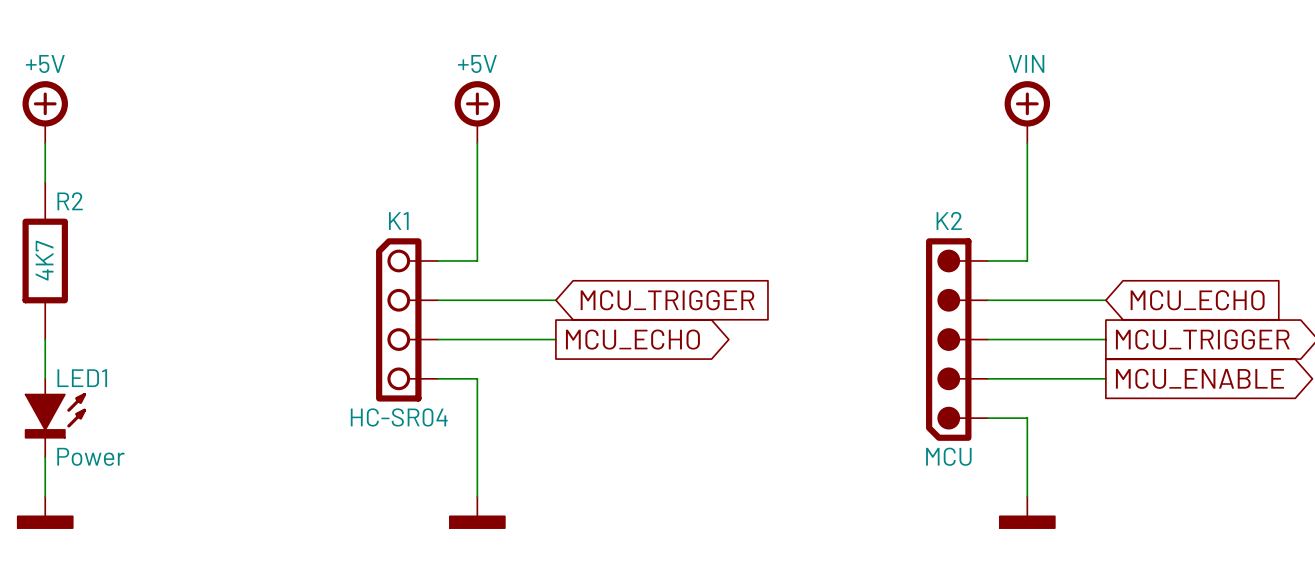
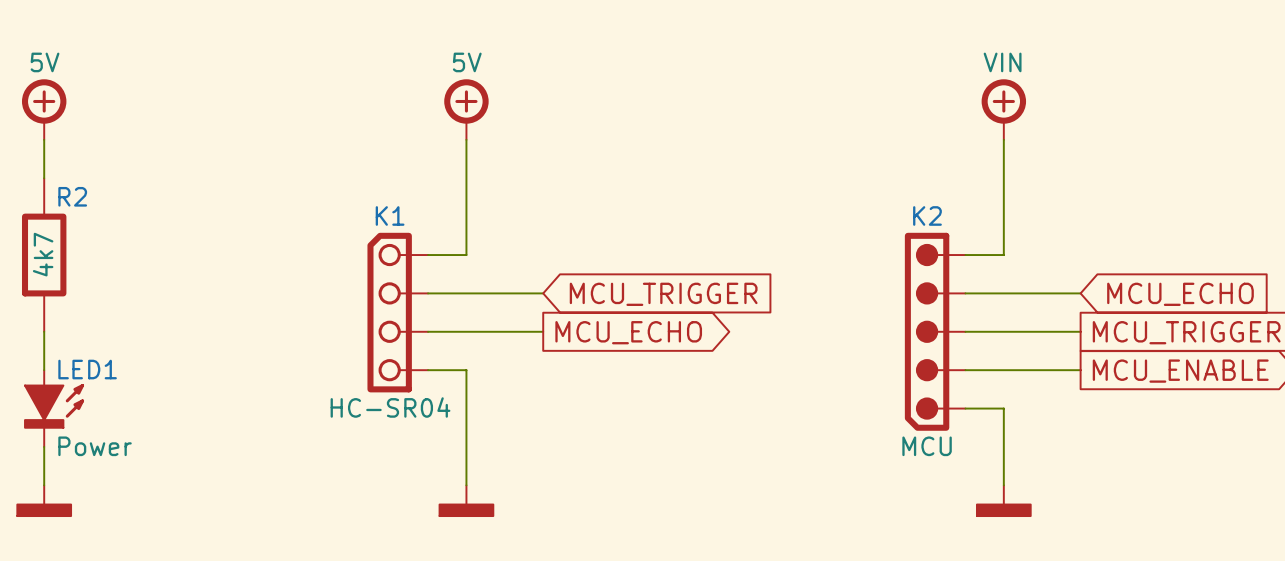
power symbol text: +5V (45, 63) -> 5V (45, 62)
power symbol text: +5V (477, 63) -> 5V (467, 62)
R2 value: 4K7 (44, 260) -> 4k7 (43, 254)

